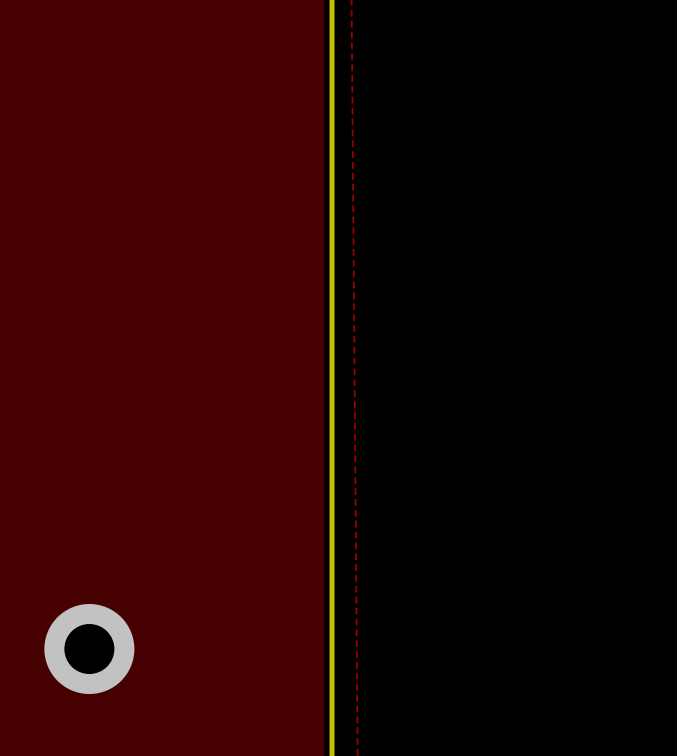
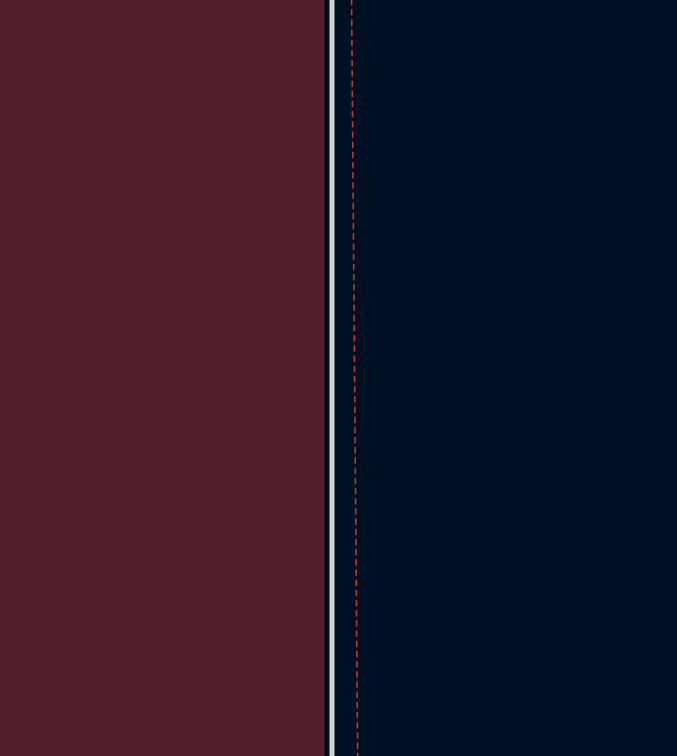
via: (89, 649) -> none

